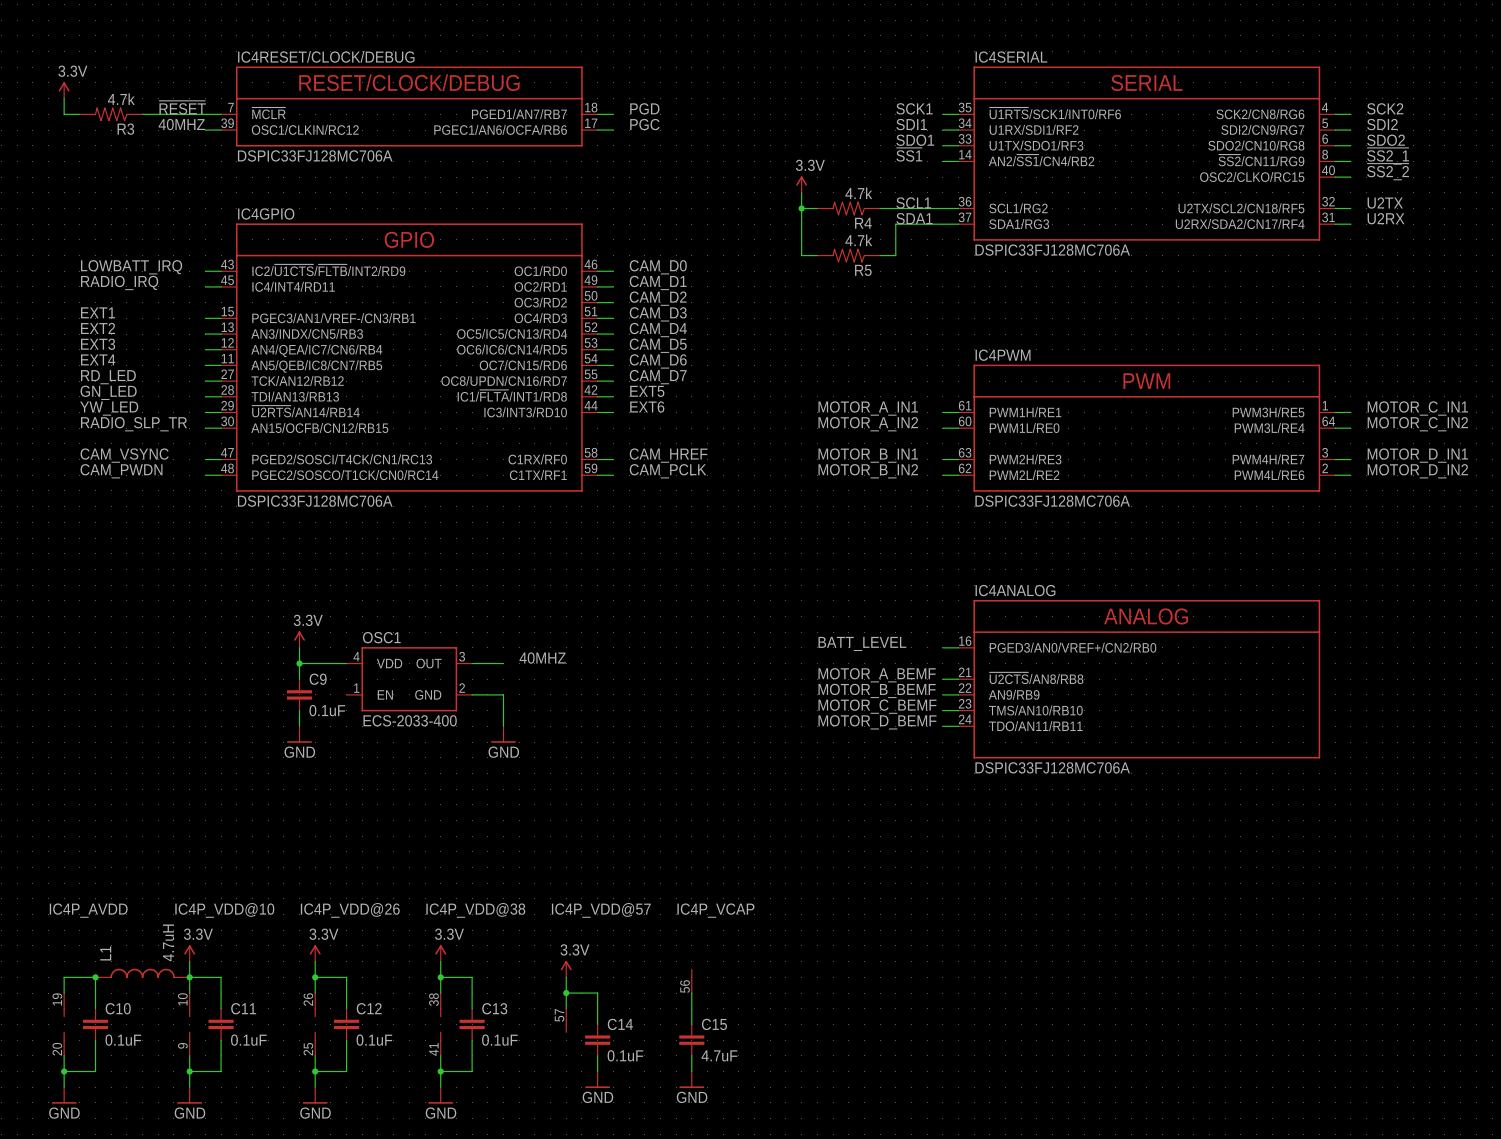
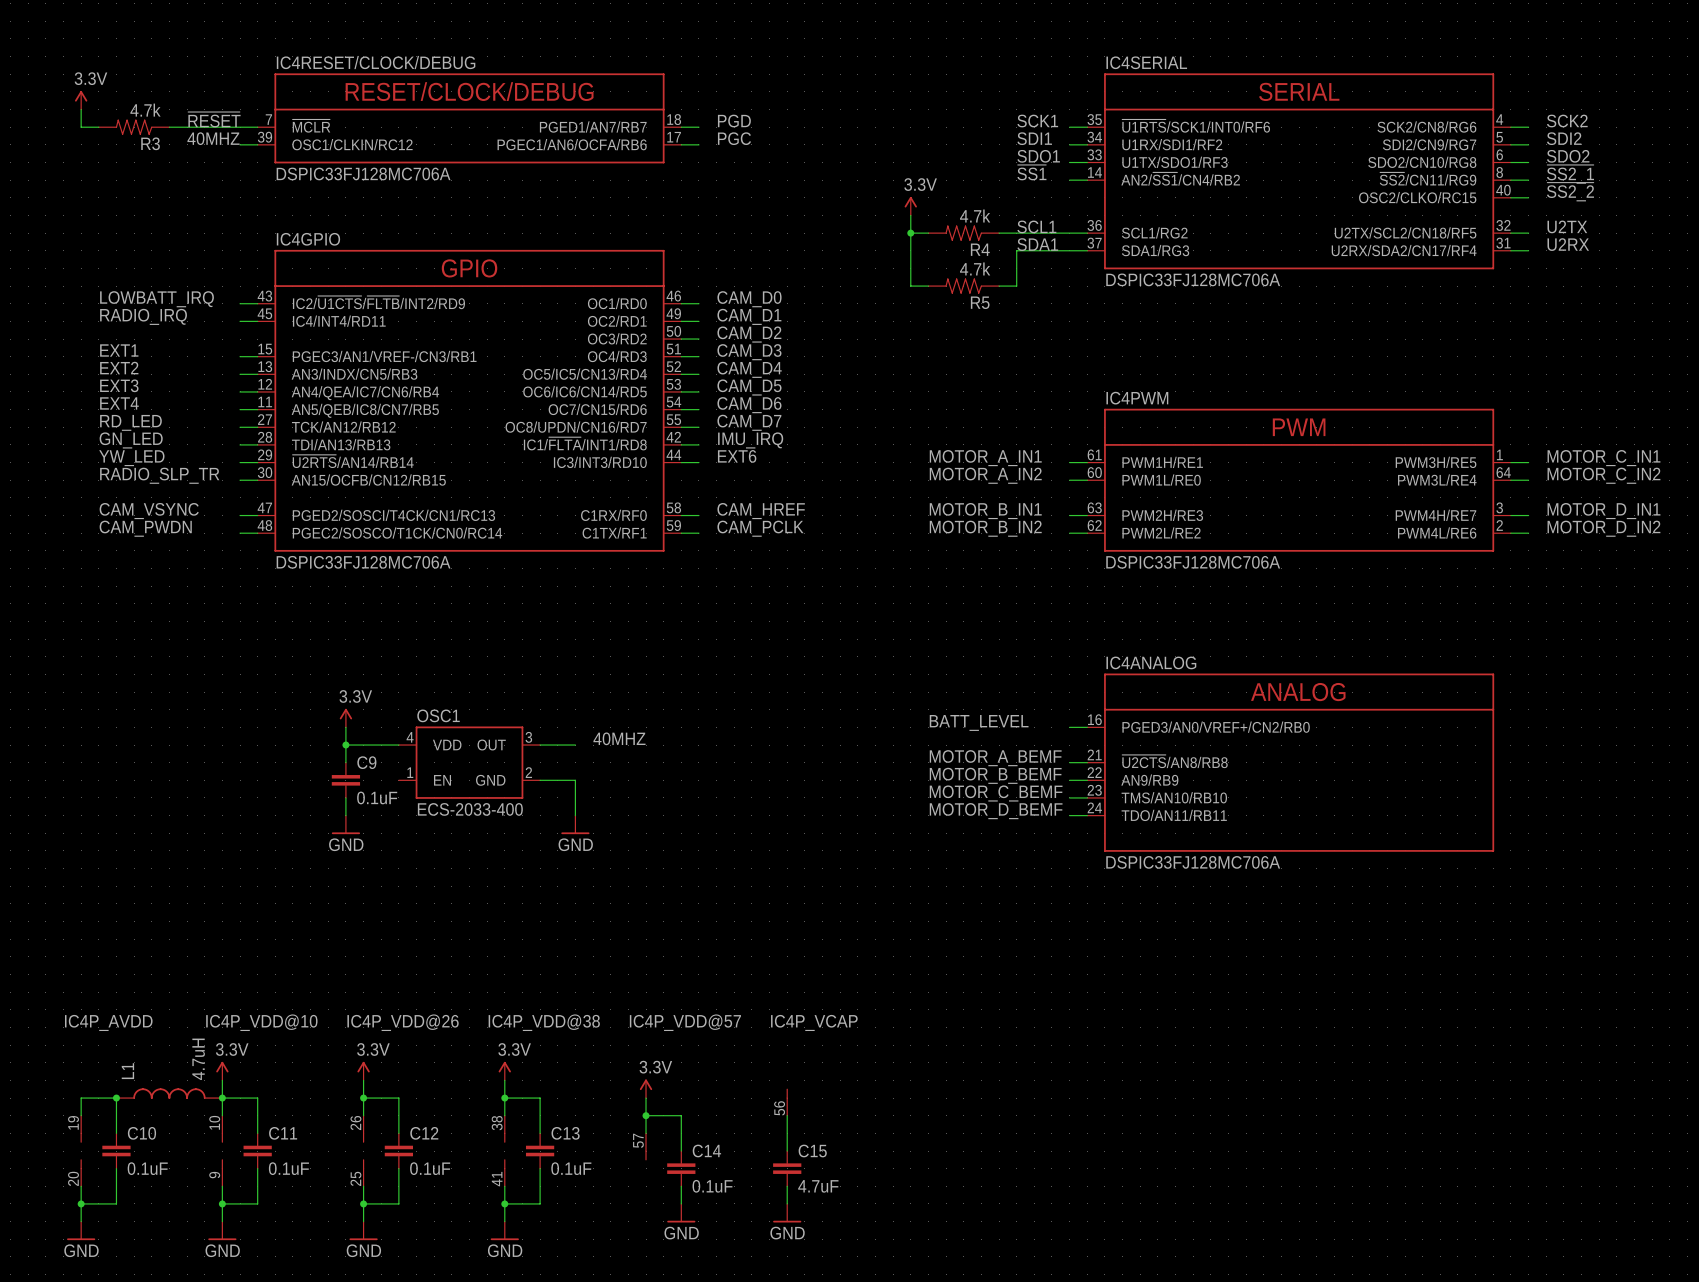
label: EXT5 (647, 391) -> IMU_IRQ (750, 440)

